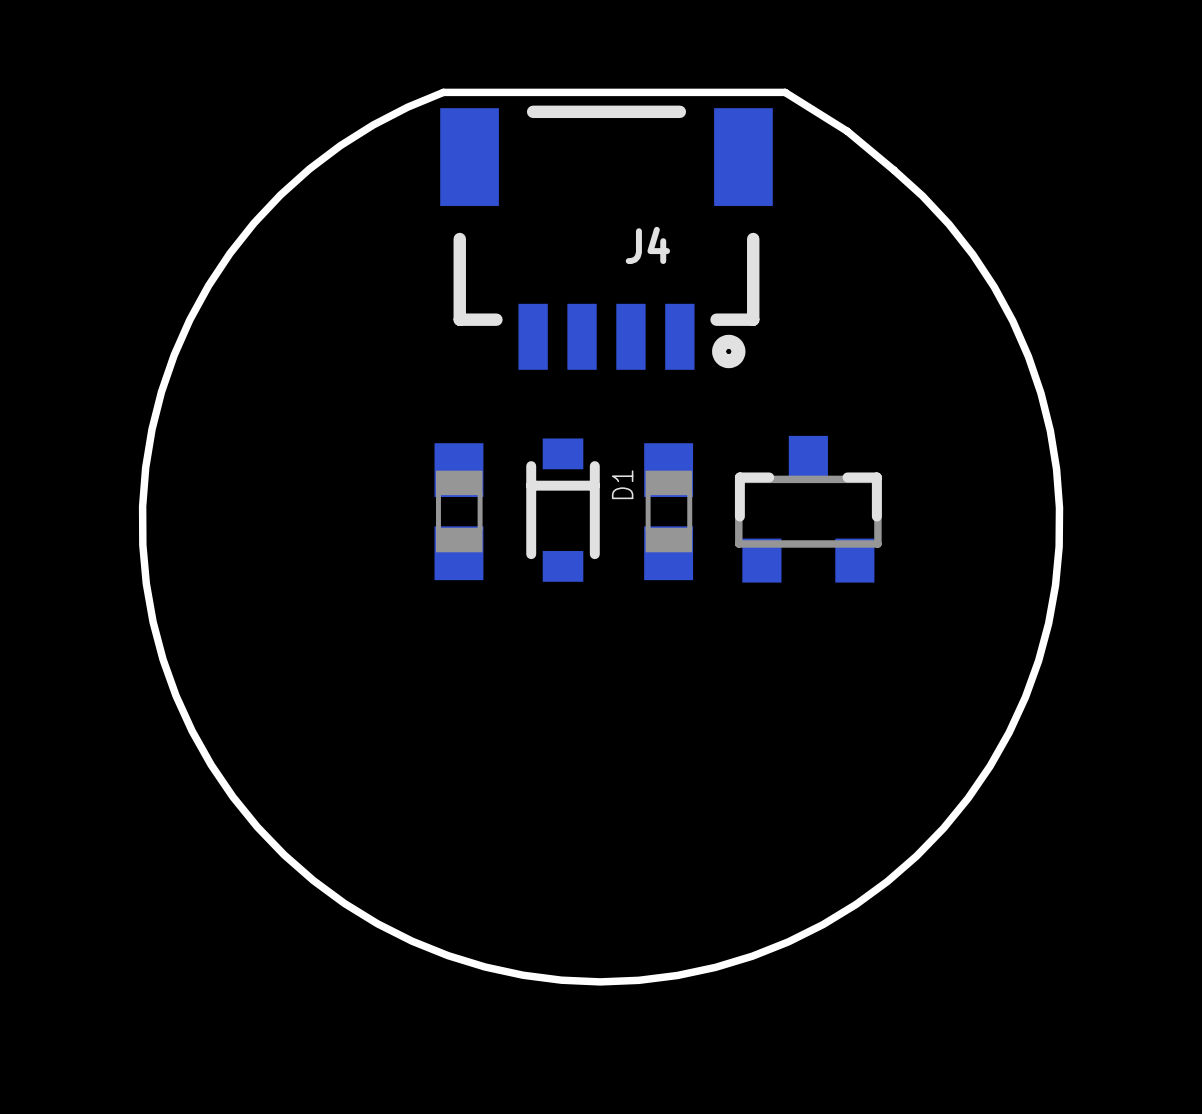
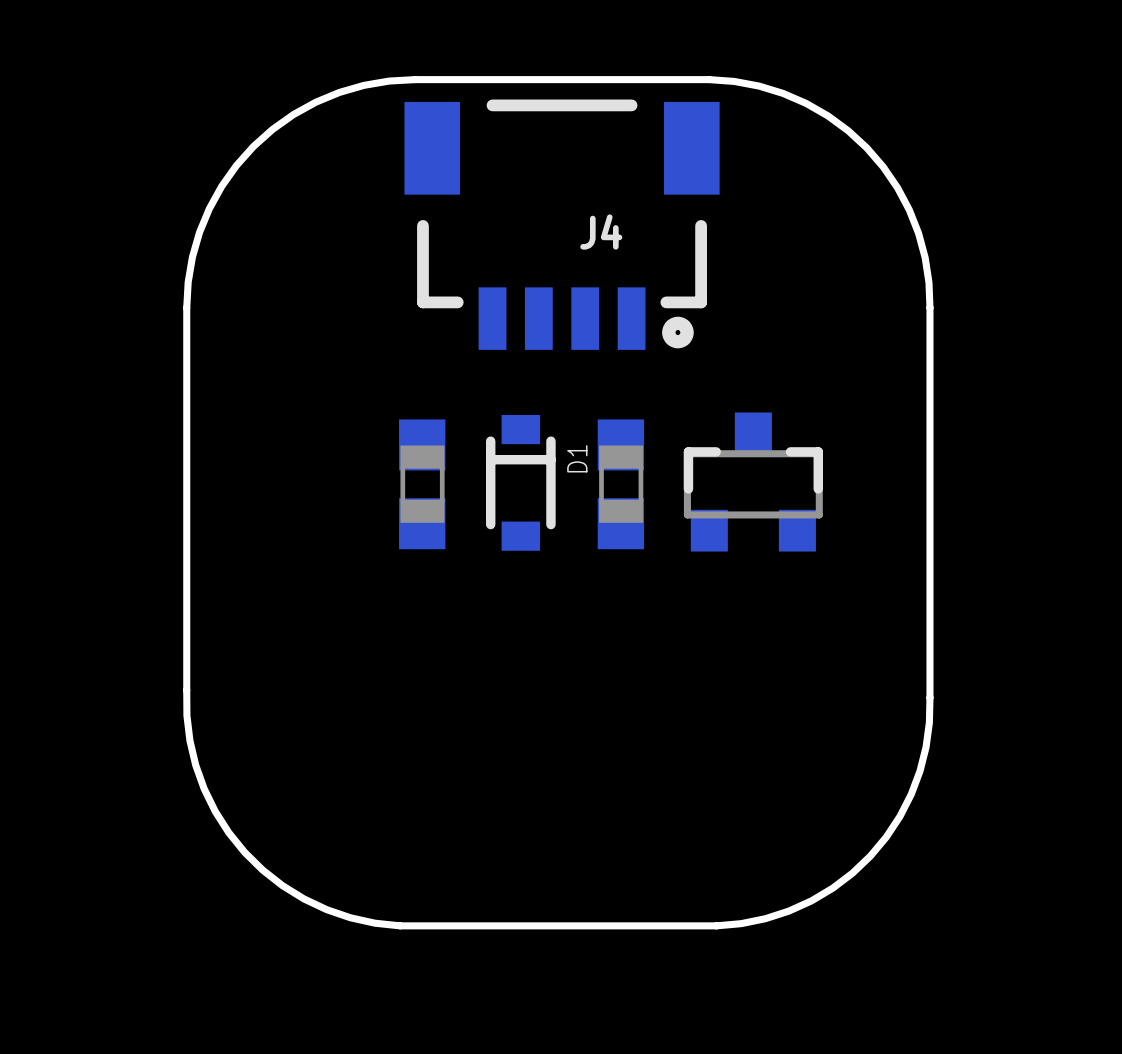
board edge: (785, 92) (443, 92) (407, 107) (373, 125) (340, 145) (309, 169) (280, 194) (254, 223) (229, 253) (208, 285) (189, 319) (174, 355) (161, 391) (151, 429) (145, 467) (142, 506) (142, 545) (146, 583) (153, 621) (162, 659) (176, 695) (192, 731) (211, 764) (232, 796) (257, 826) (284, 854) (313, 880) (344, 903) (377, 923) (412, 941) (448, 955) (485, 967) (523, 975) (561, 980) (600, 981) (638, 980) (677, 975) (715, 967) (752, 956) (788, 941) (823, 924) (856, 904) (887, 881) (916, 855) (943, 828) (968, 798) (990, 766) (1009, 732) (1025, 697) (1038, 660) (1048, 623) (1055, 585) (1059, 546) (1059, 507) (1056, 469) (1050, 430) (1040, 393) (1028, 356) (1012, 321) (994, 287) (973, 254) (949, 224) (922, 196) (847, 131) (785, 92) -> (709, 79) (759, 86) (806, 103) (828, 115) (866, 147) (883, 166) (897, 187) (918, 233) (925, 257) (929, 307) (929, 697) (926, 747) (911, 794) (886, 836) (852, 873) (811, 900) (765, 918) (741, 923) (716, 925) (400, 925) (350, 917) (303, 898) (262, 870) (228, 832) (204, 788) (189, 740) (186, 715) (186, 307) (192, 256) (209, 208) (236, 165) (272, 129) (315, 102) (364, 85) (414, 79) (709, 79)

